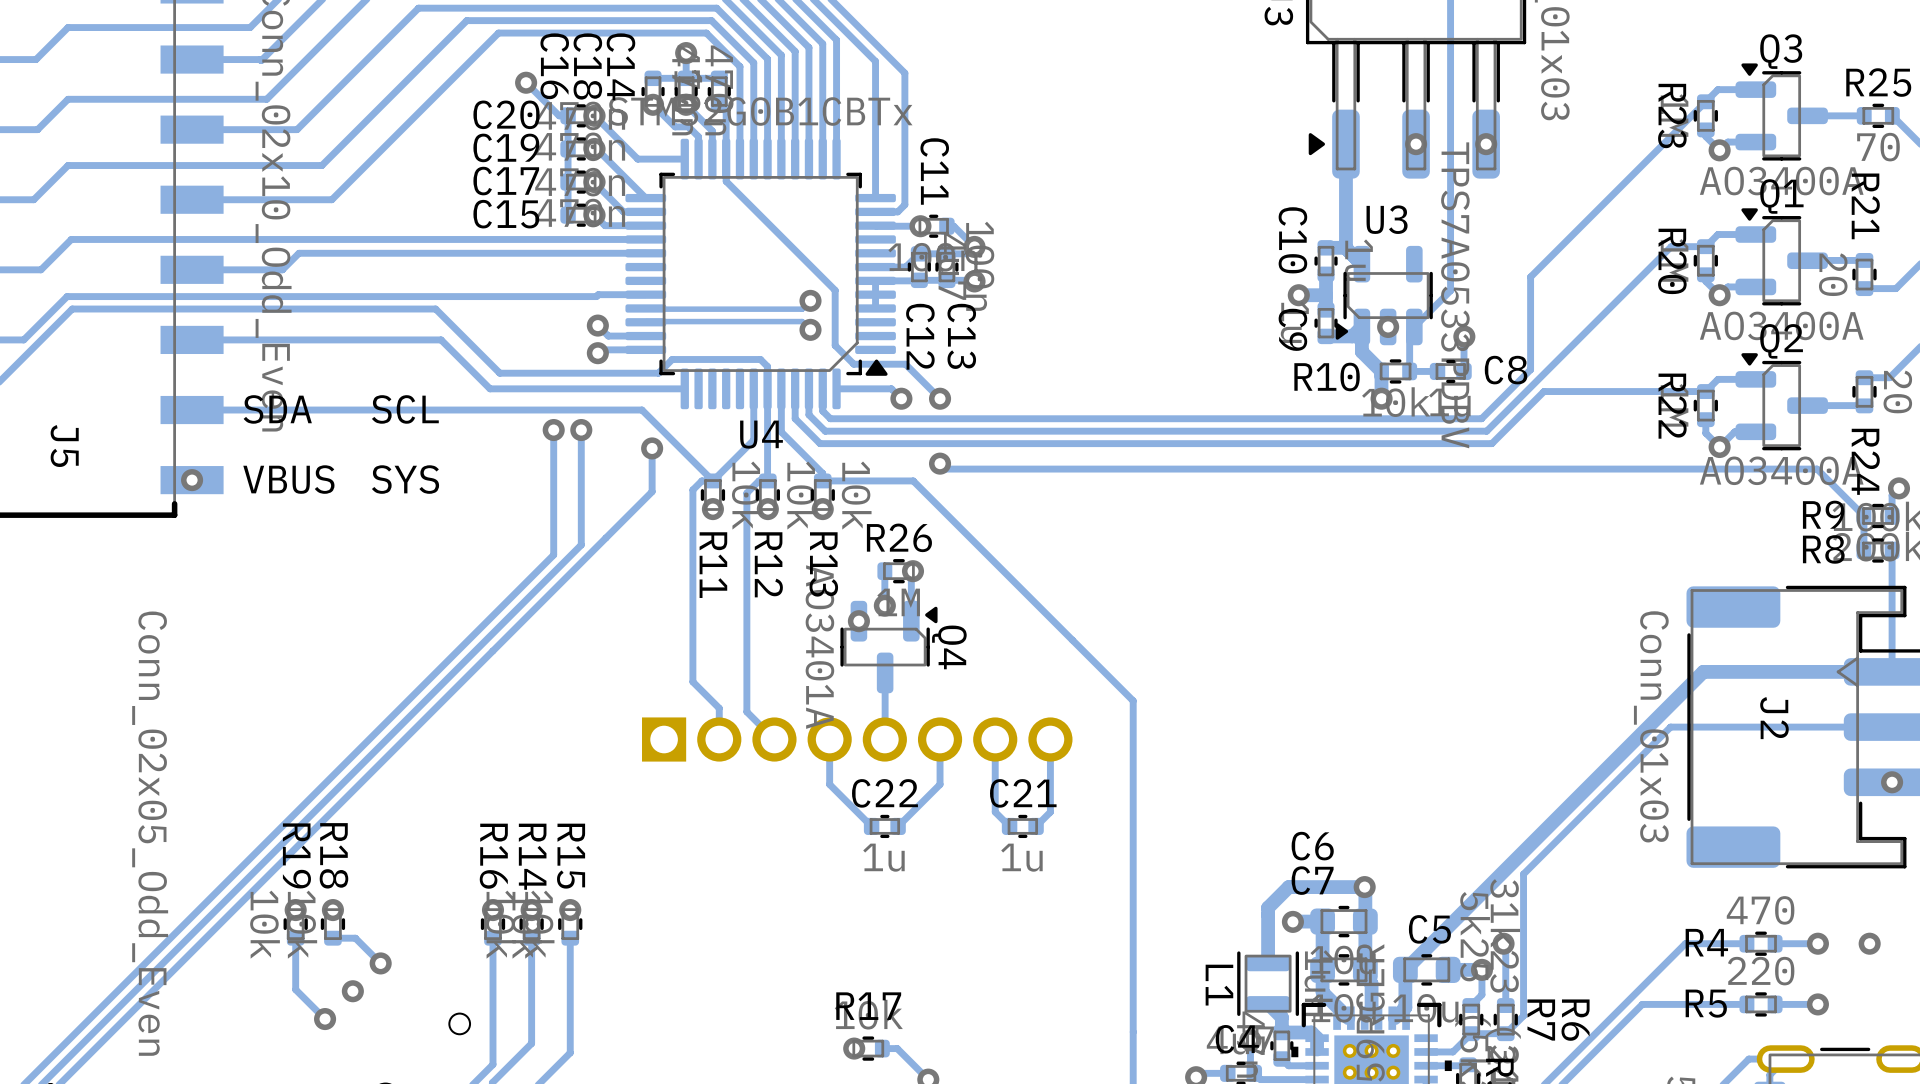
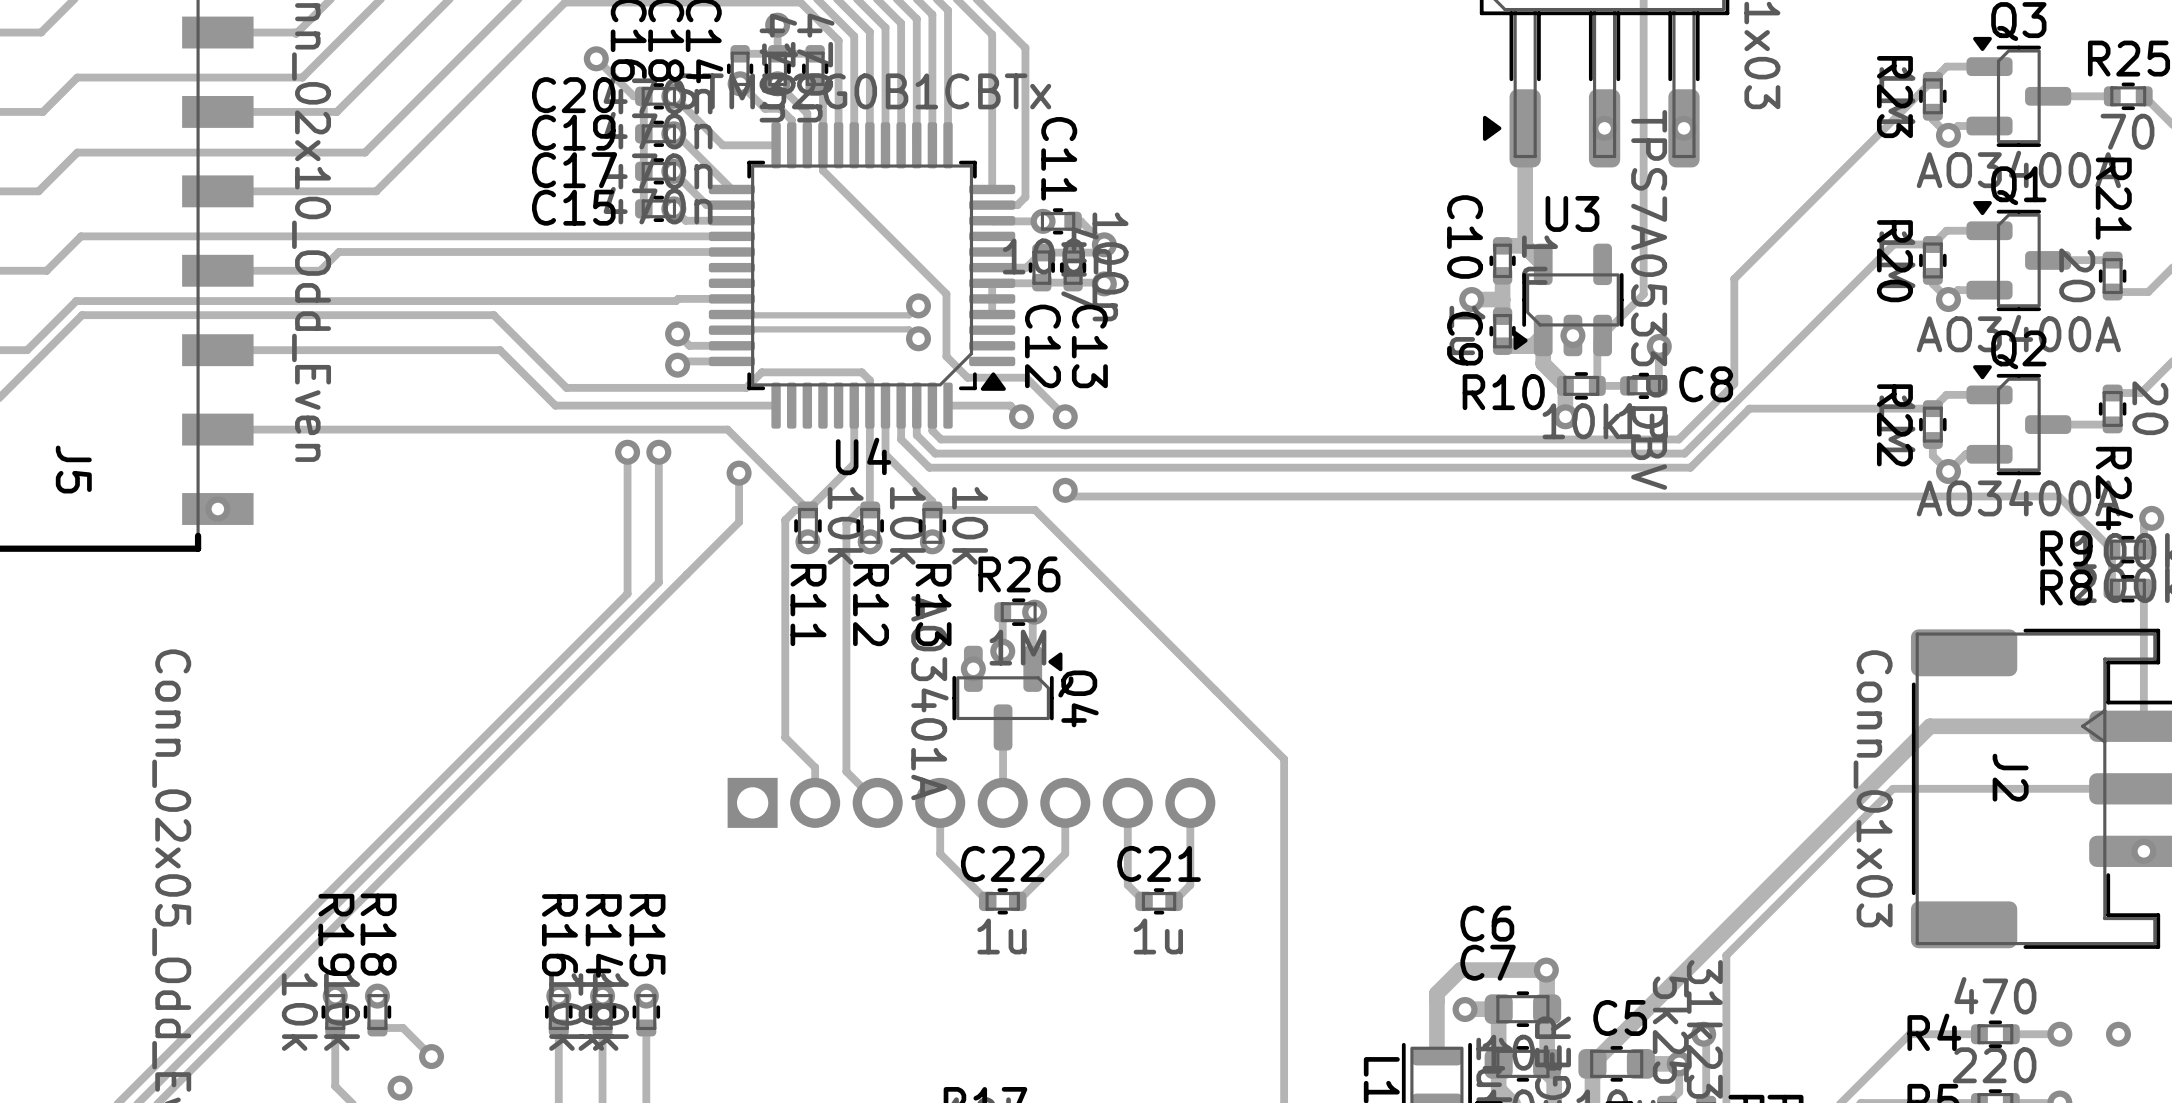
text: SDA (277, 409) -> none
text: SCL (405, 409) -> none
text: VBUS (288, 479) -> none
text: SYS (405, 479) -> none

